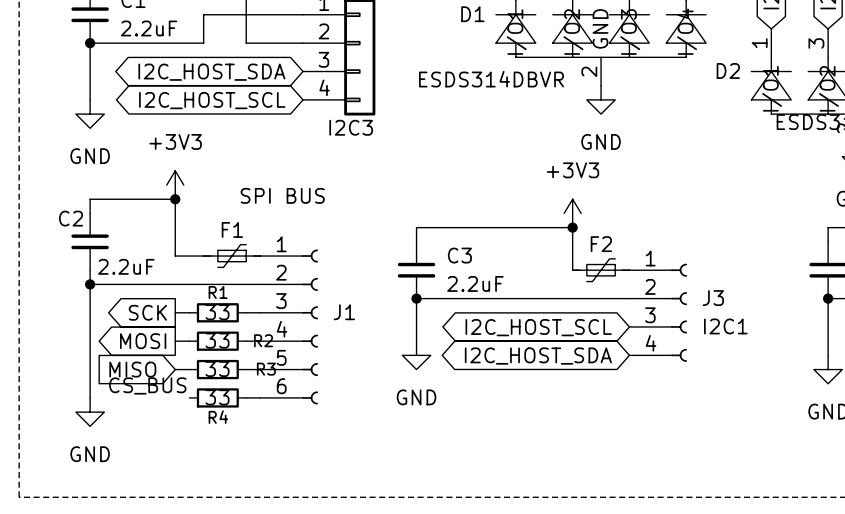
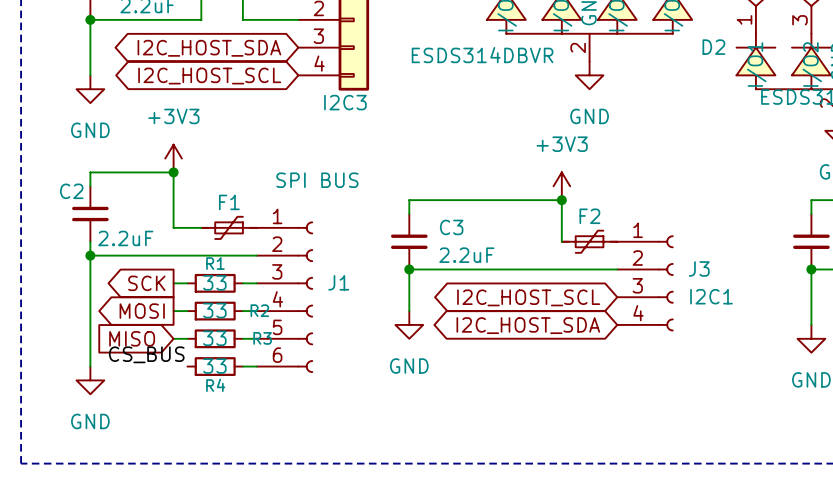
J1 value position: SPI BUS (282, 195) -> SPI BUS (317, 180)

